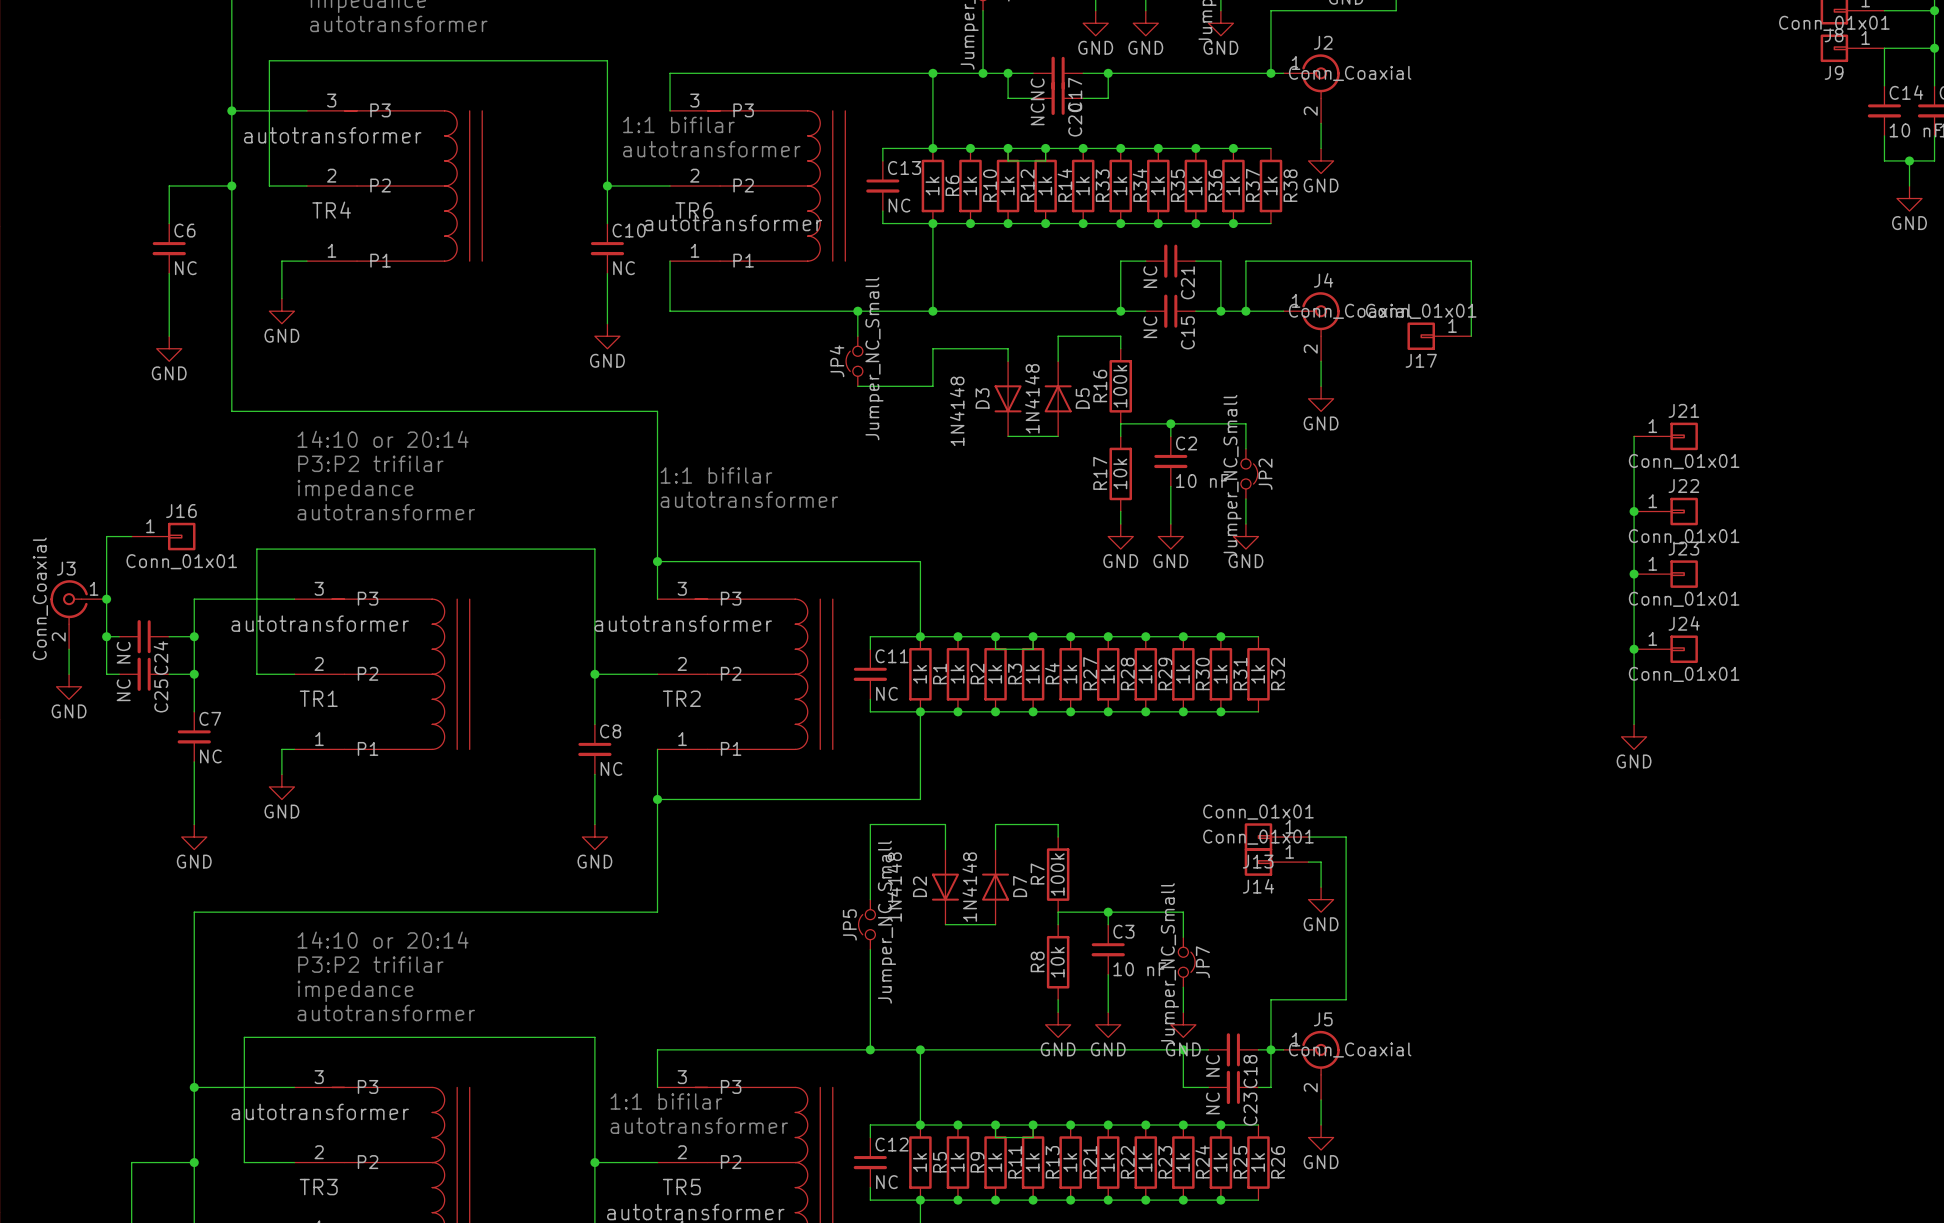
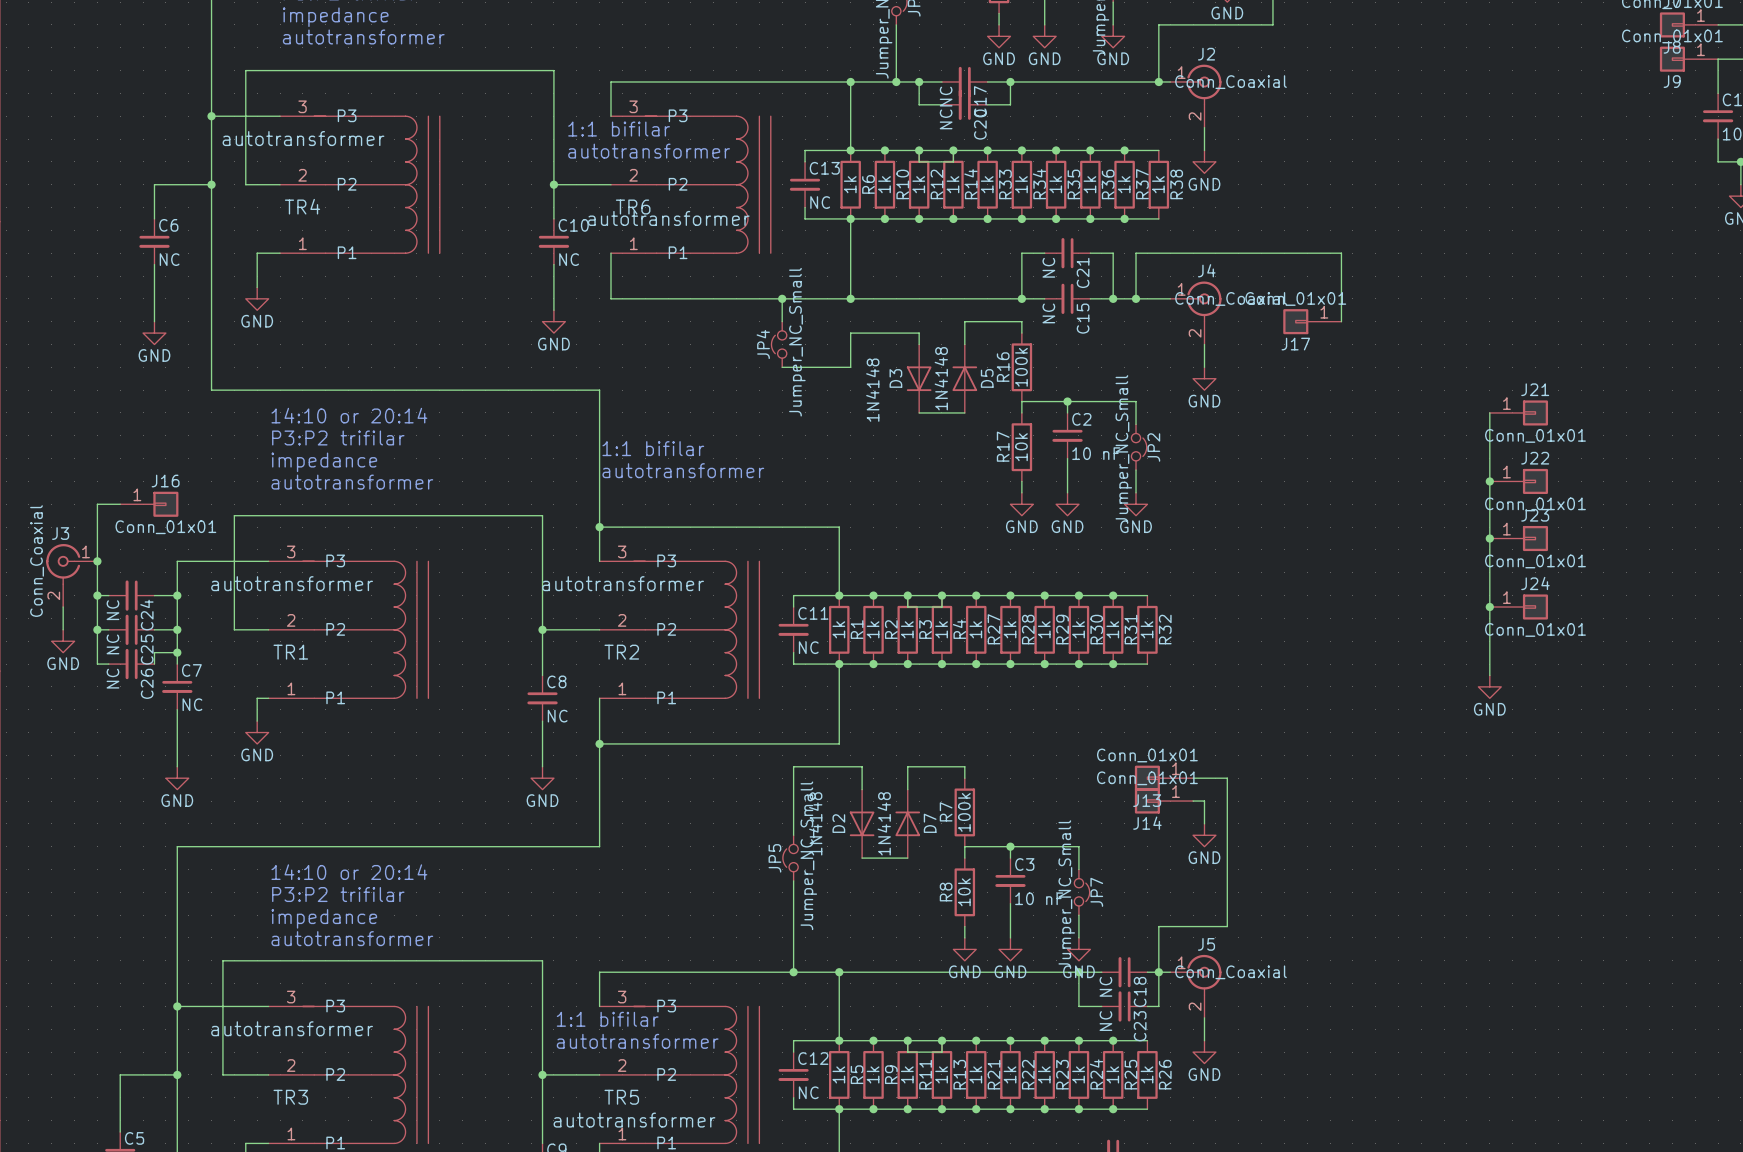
wire: none -> (97, 629) (97, 664) (108, 664)
junction: none -> (97, 629)
wire: none -> (177, 652) (154, 652) (154, 664)
junction: none -> (177, 652)
C26: none -> NC (131, 664)

